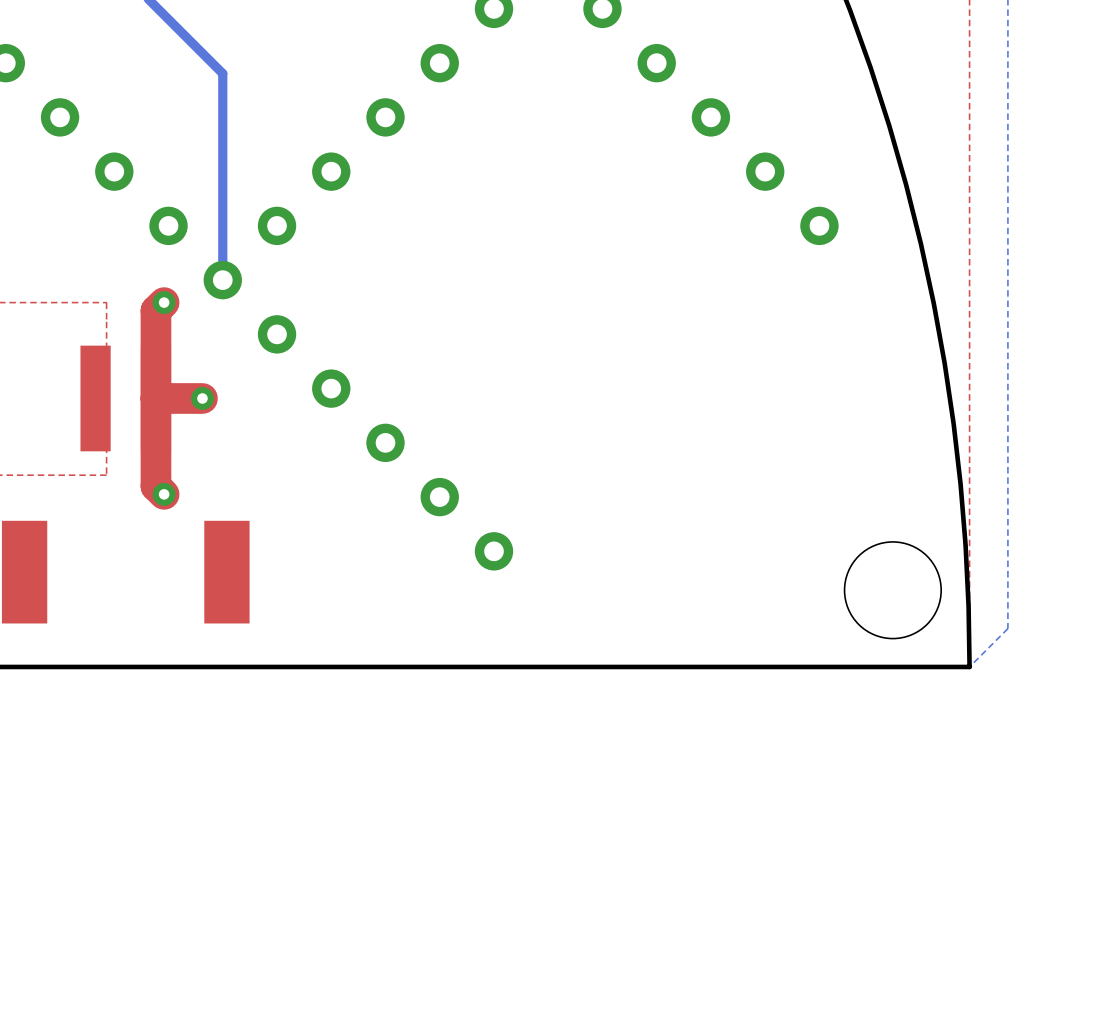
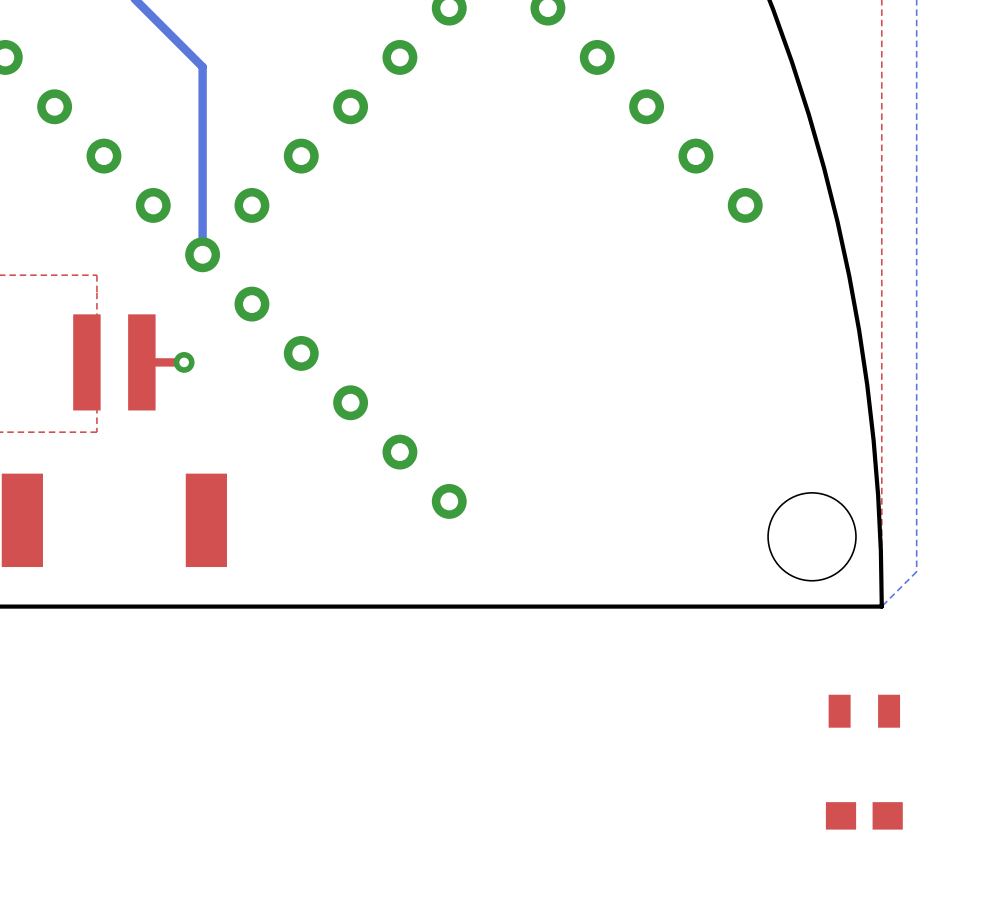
top track: (164, 302) (155, 310) (155, 486) (164, 494) -> none
via: (164, 302) -> none
top track width: thick (202, 398) (155, 398) -> thin (184, 362) (141, 362)
via: (164, 494) -> none
part: none -> (864, 711)
part: none -> (864, 815)

